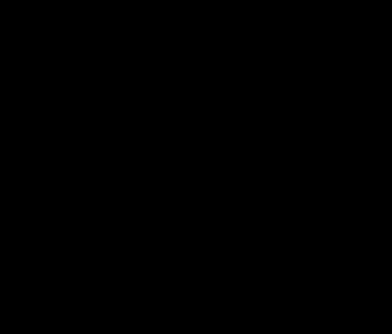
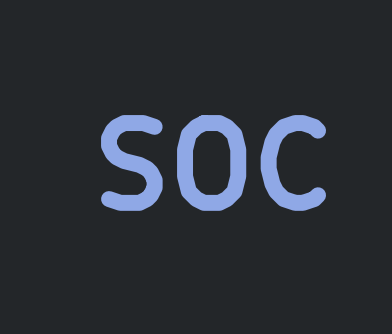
text: none -> SOC (213, 162)

